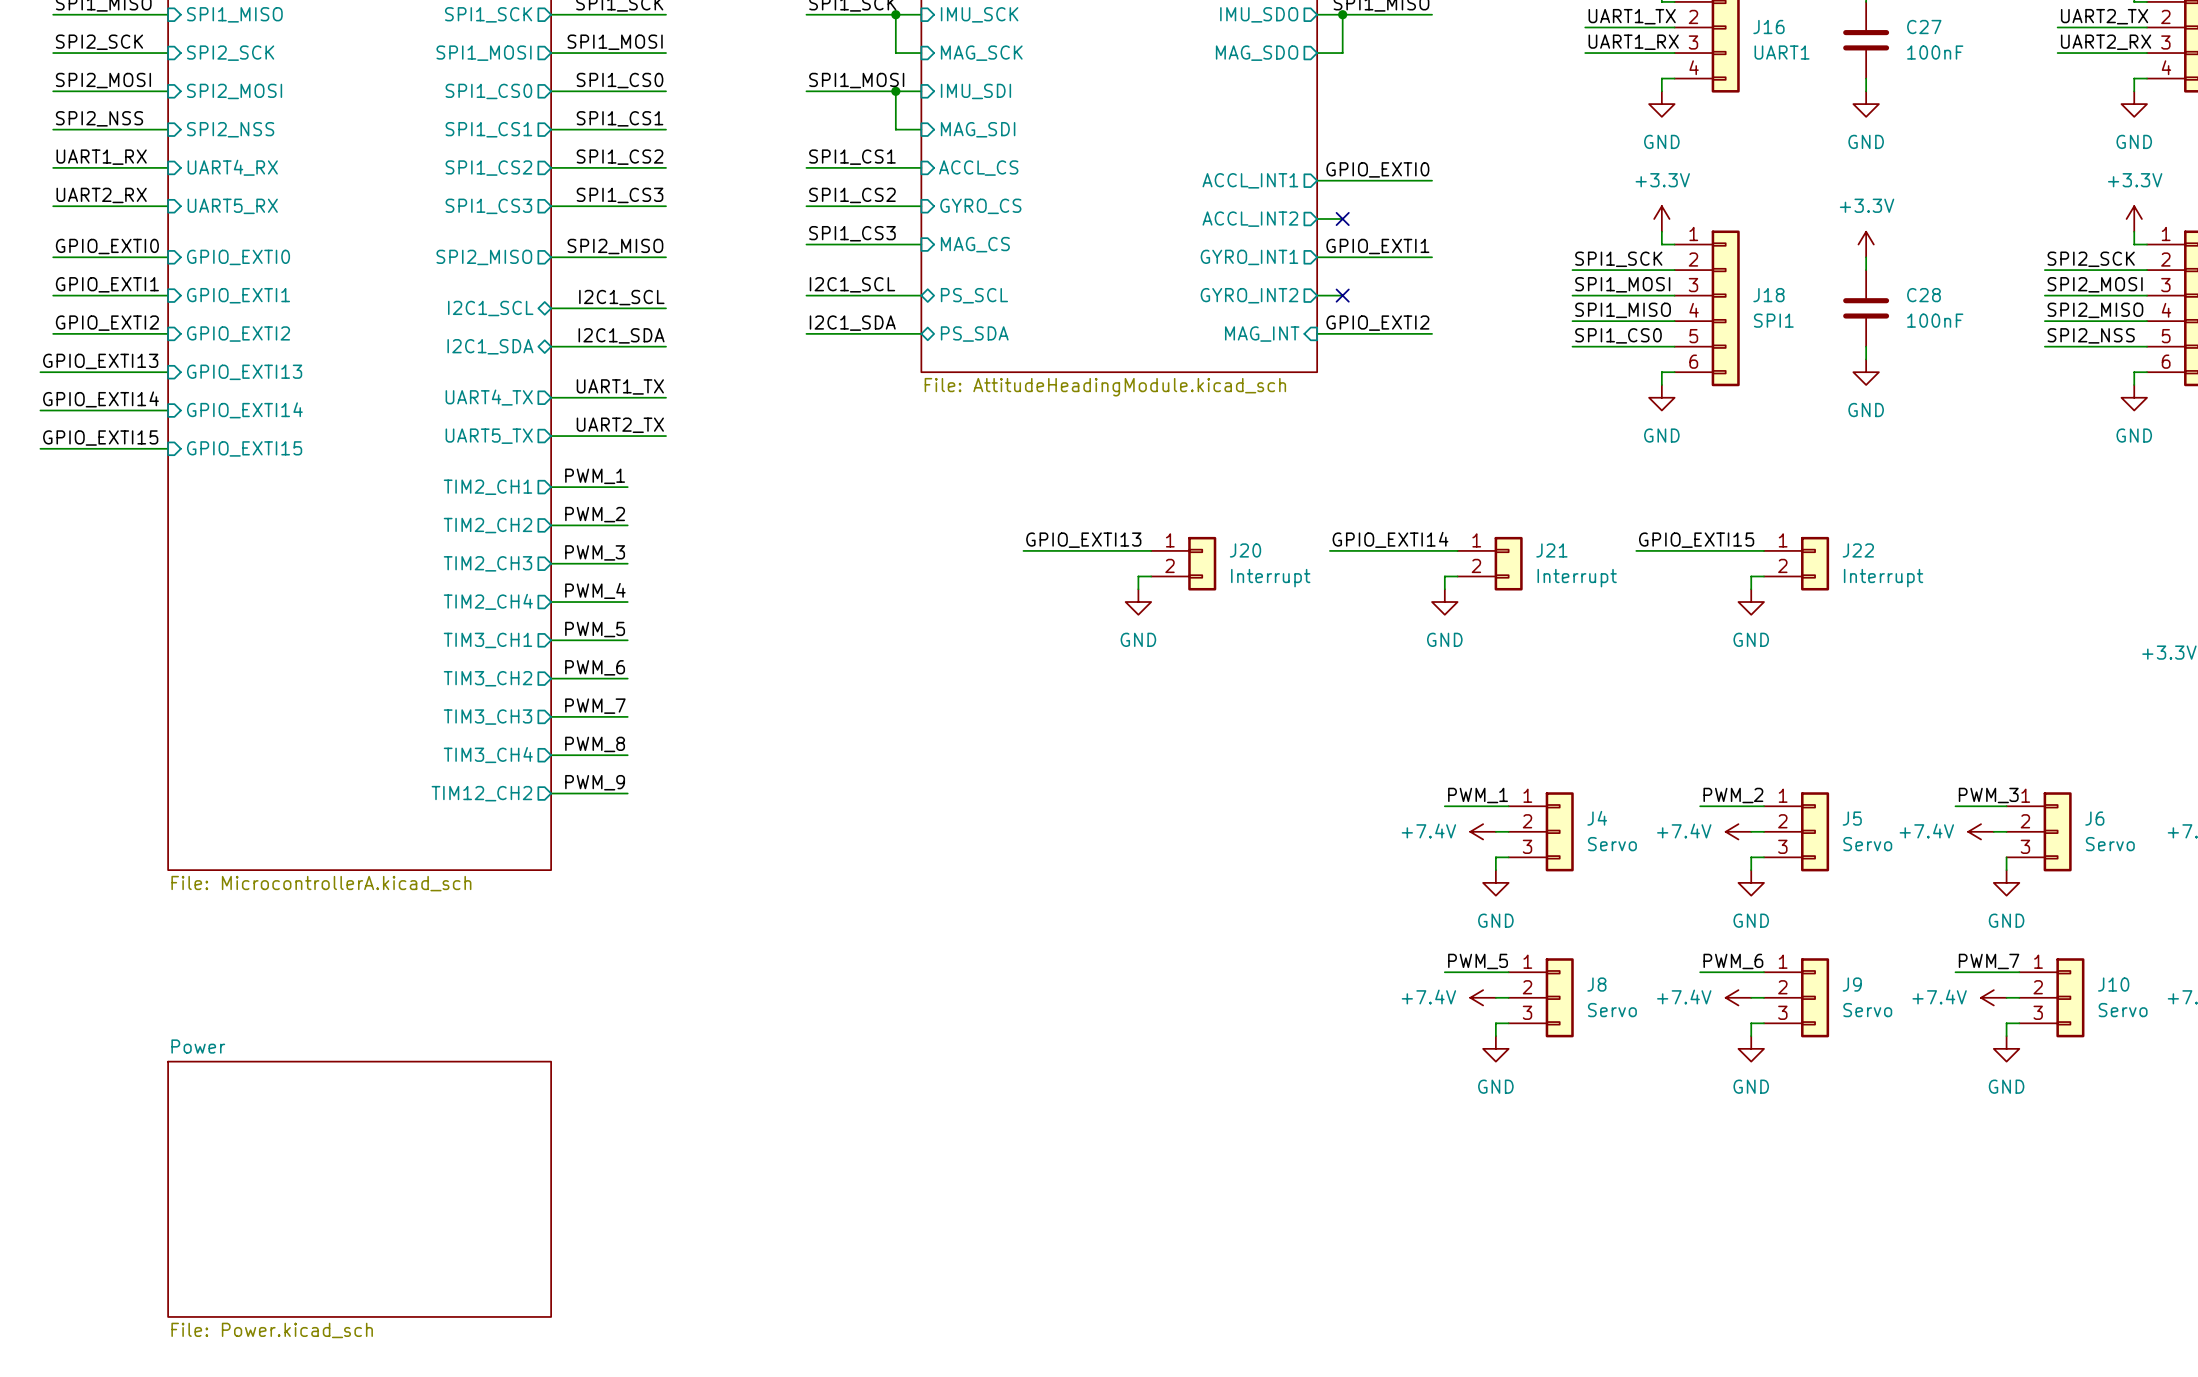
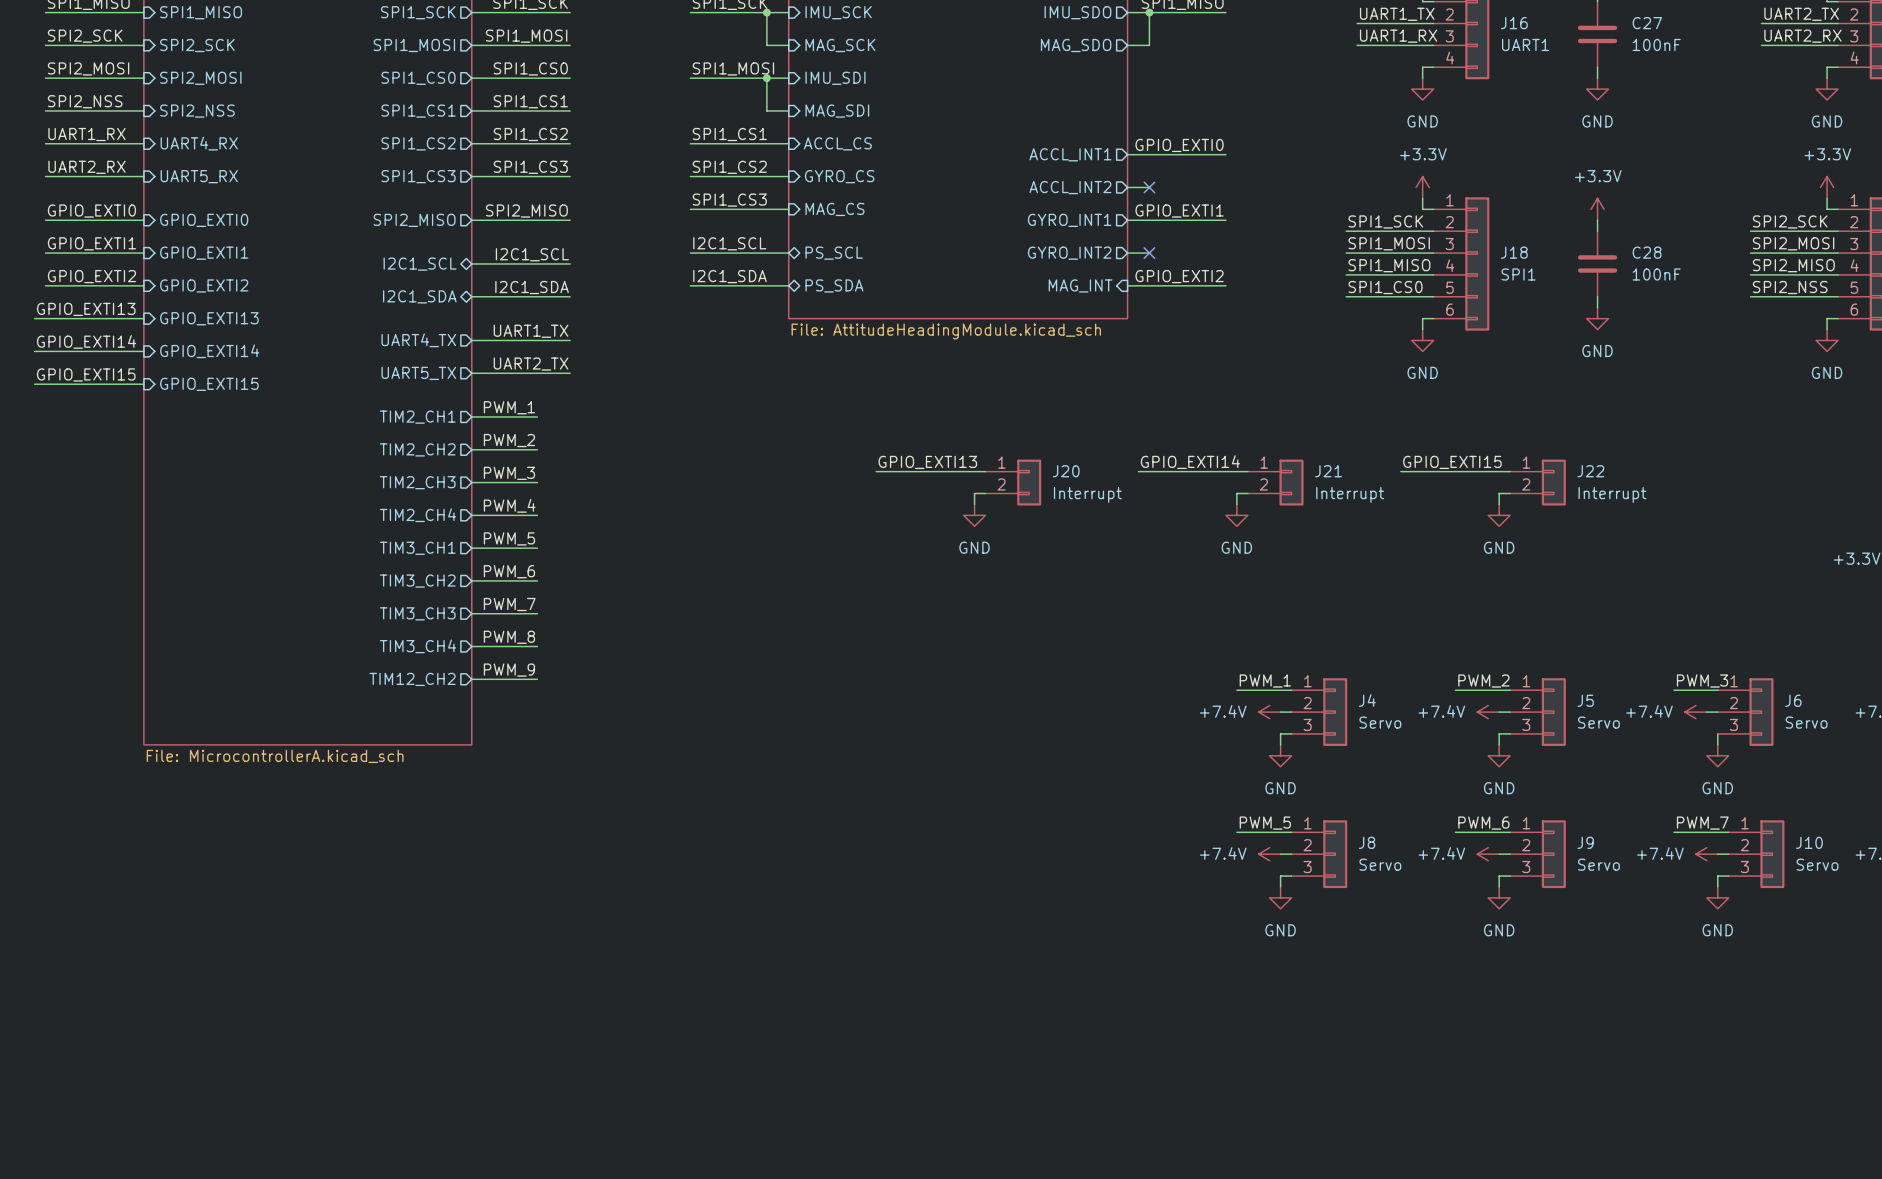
sheet Power: File: Power.kicad_sch (359, 1189) -> none

